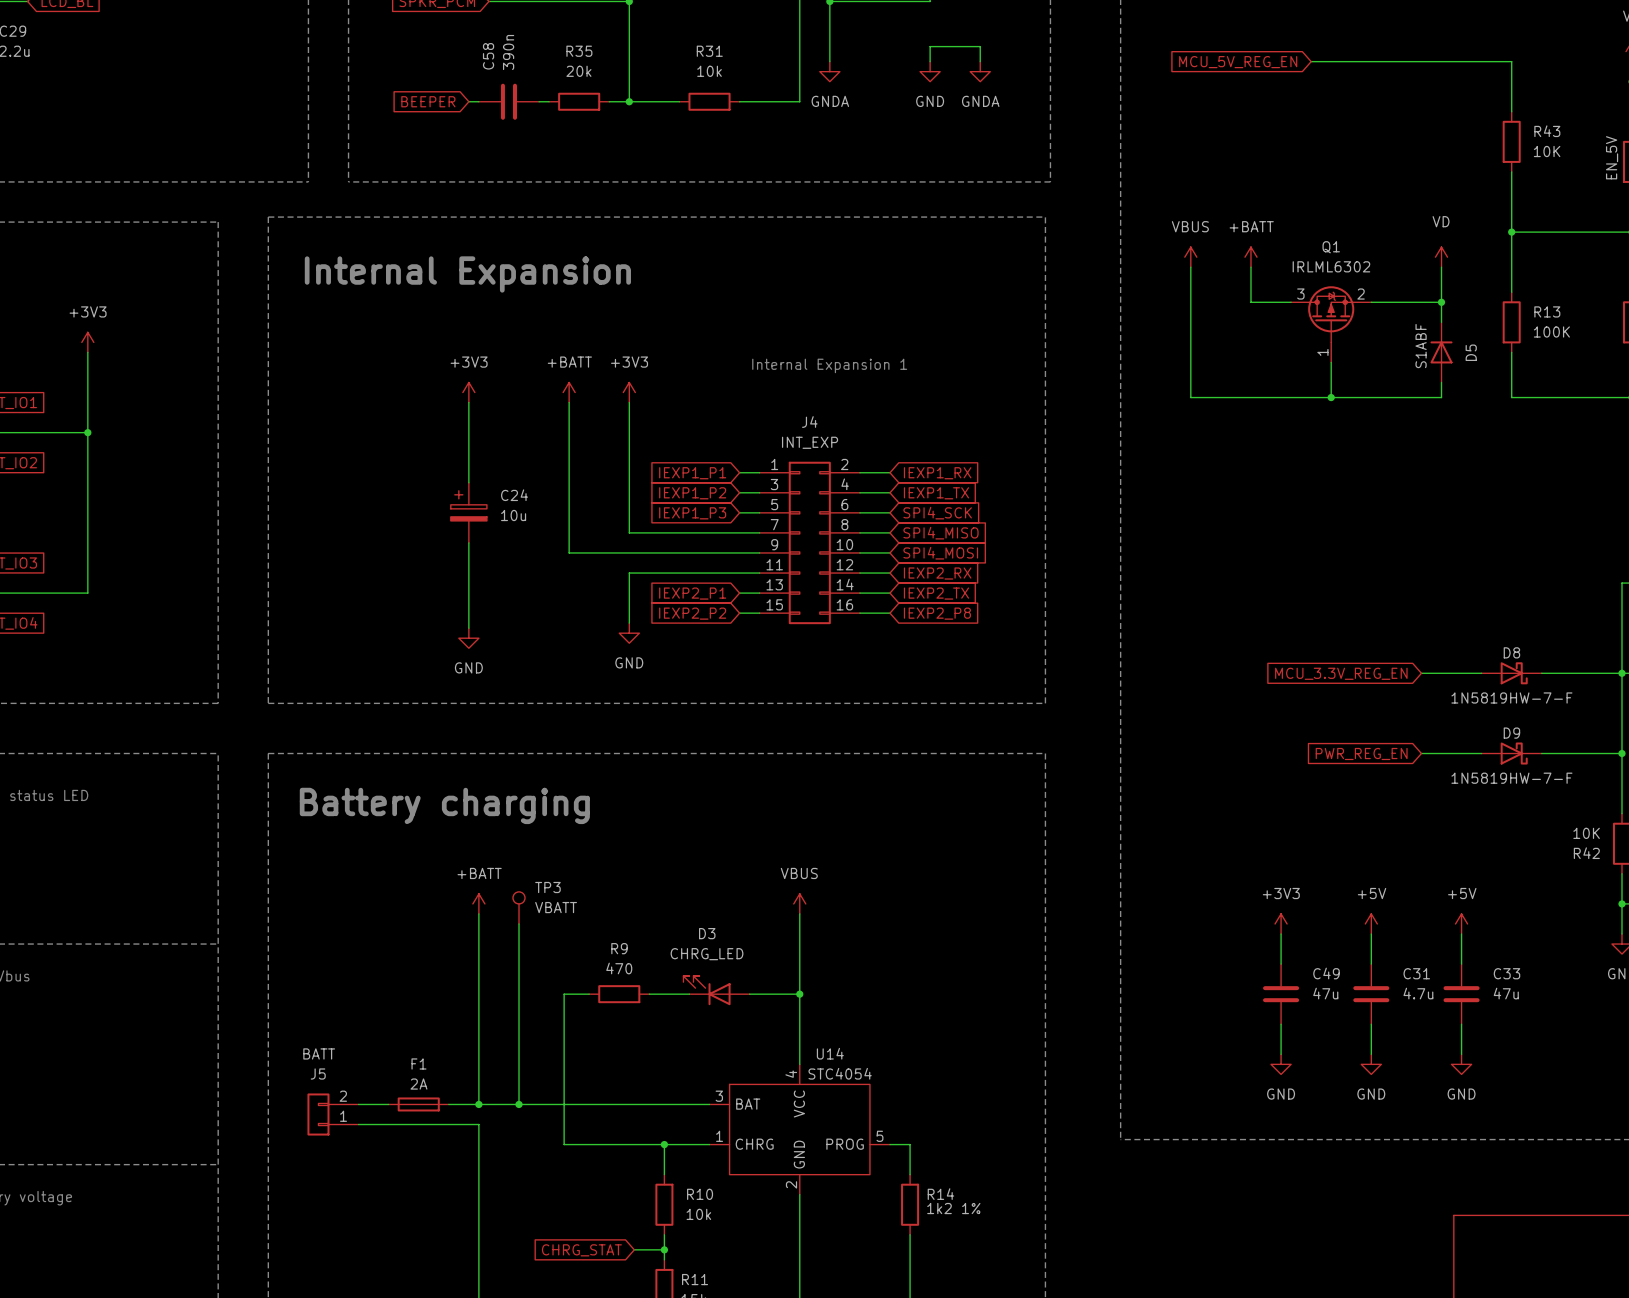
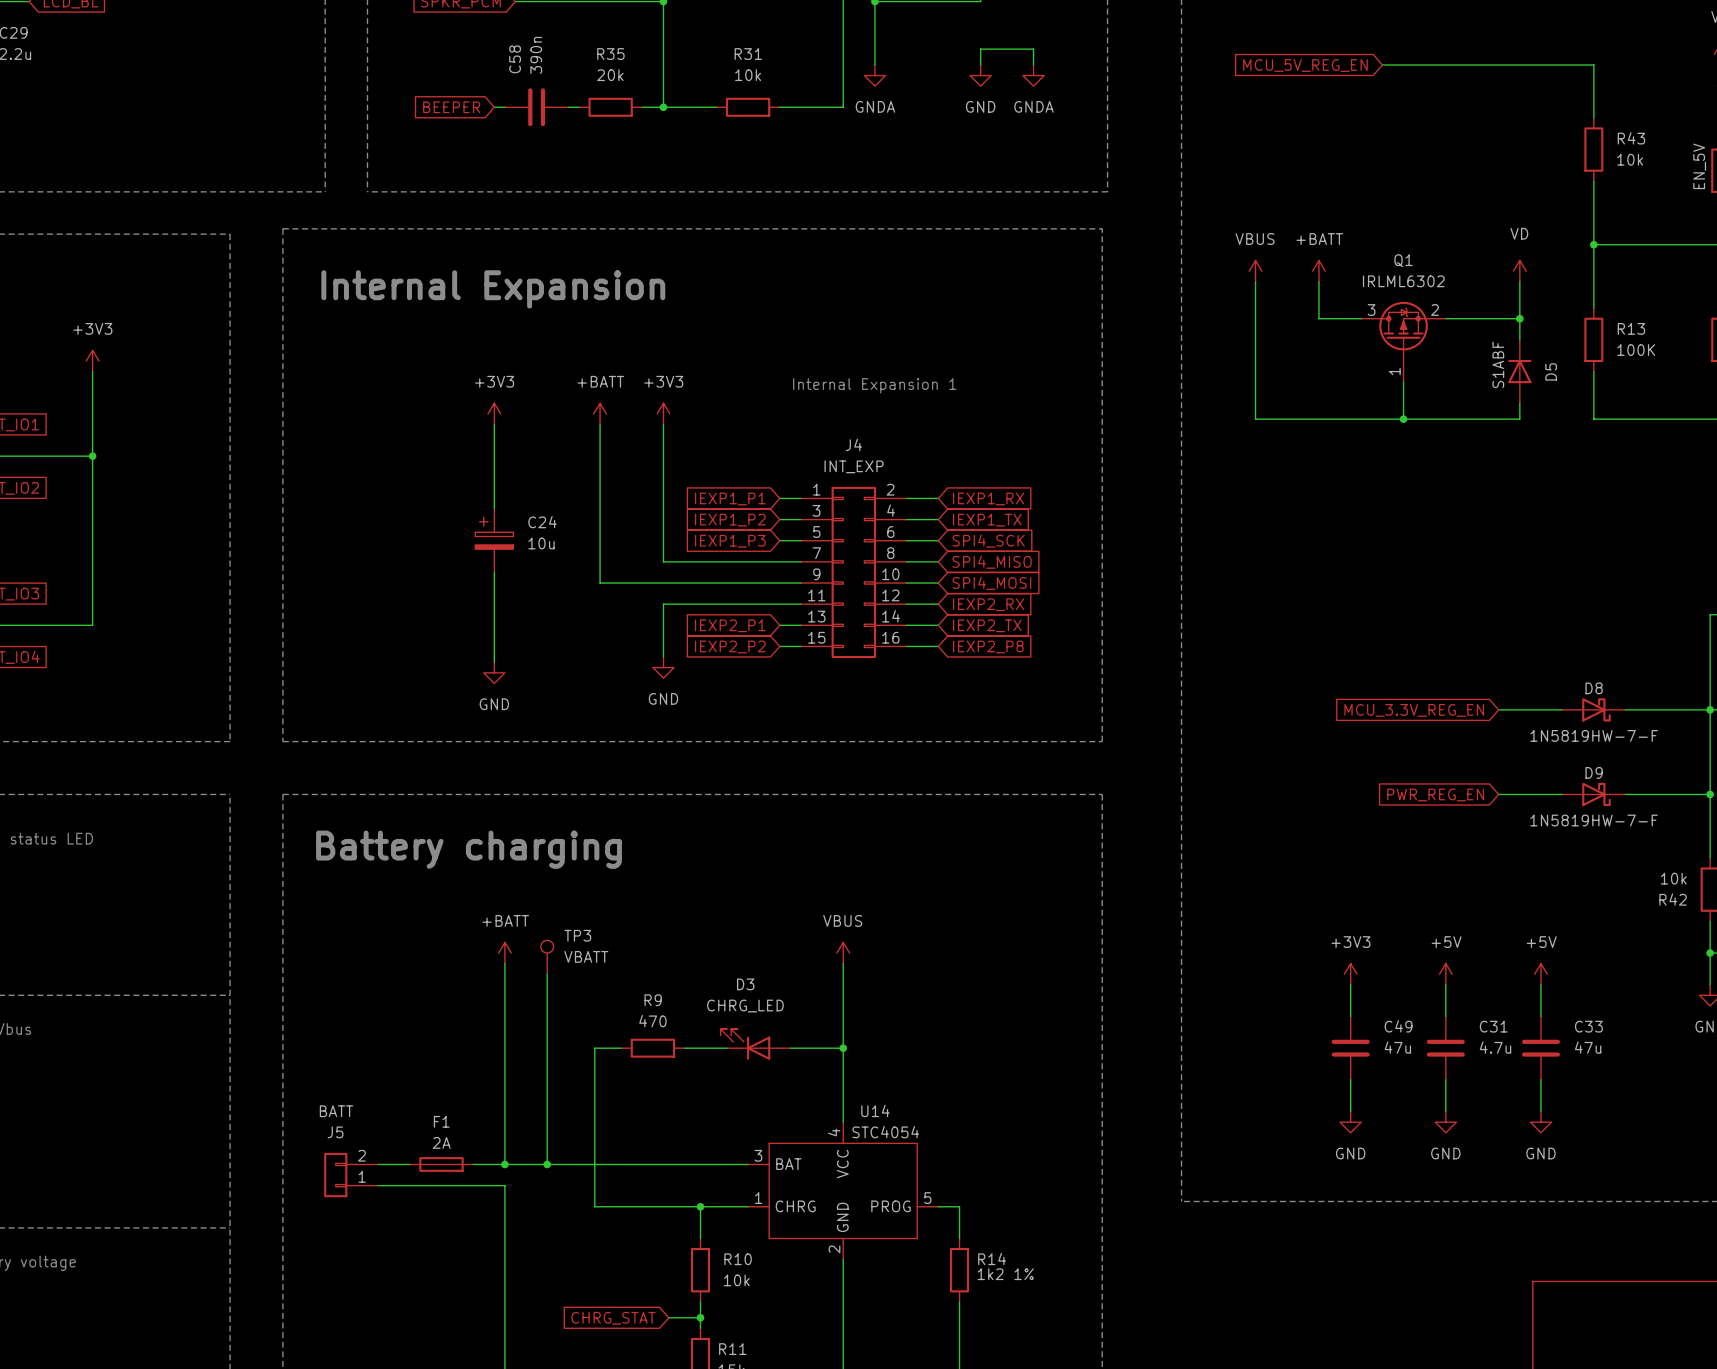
R43 value: 10K (1547, 151) -> 10k (1630, 159)
R42 value: 10K (1586, 833) -> 10k (1673, 878)

